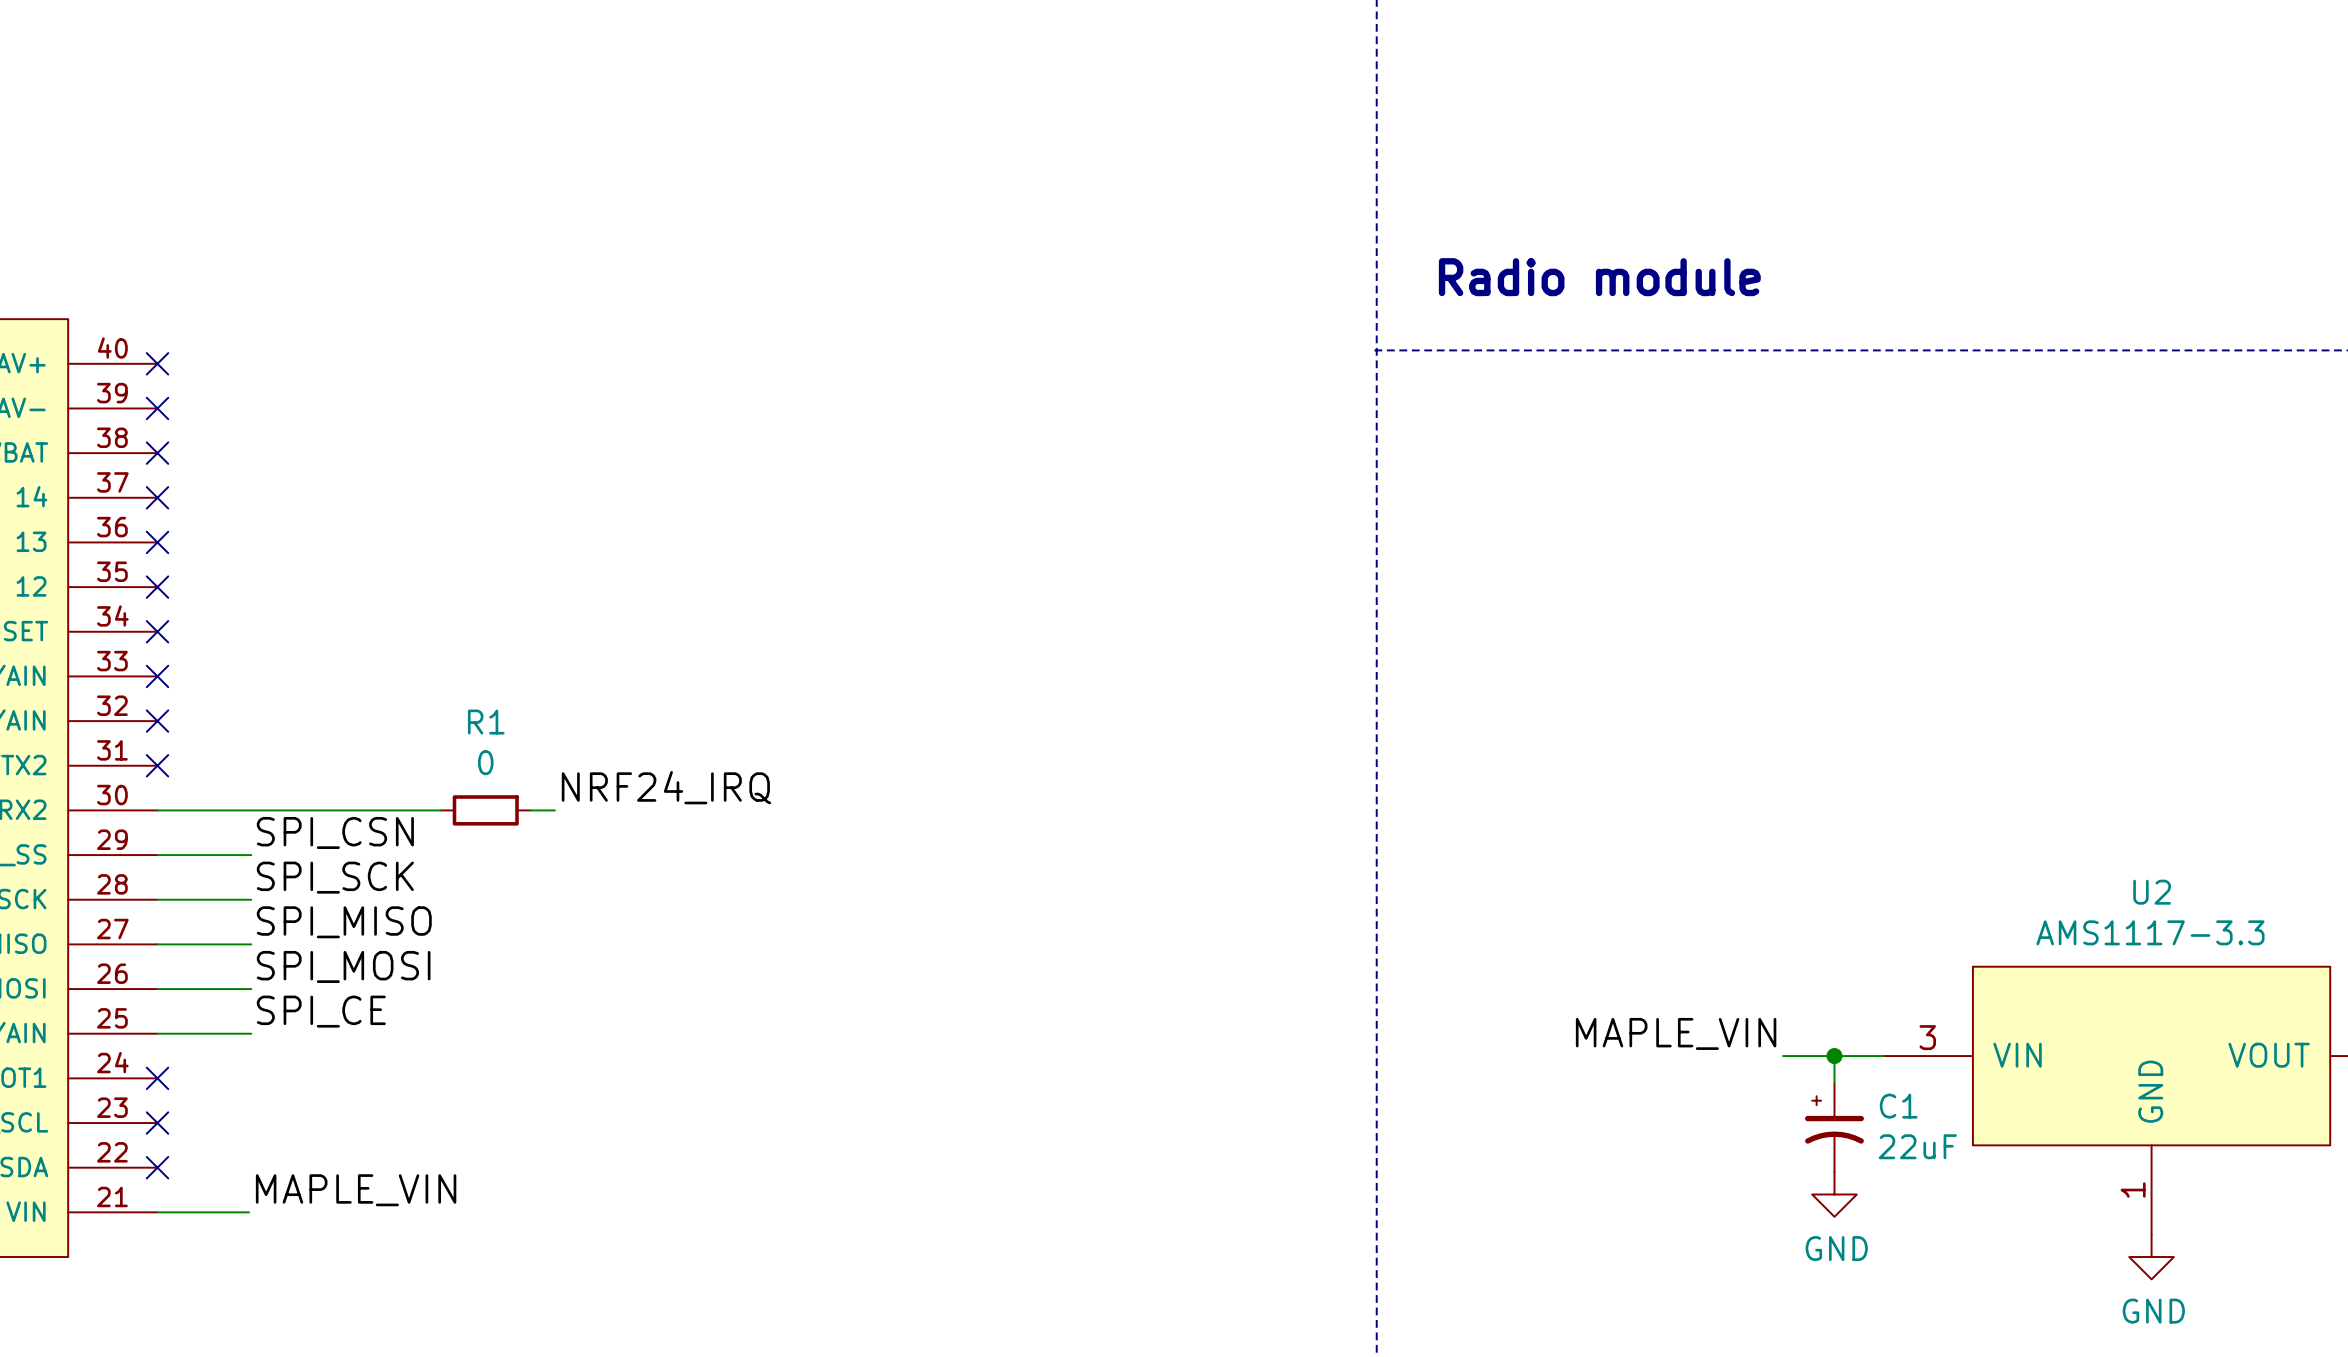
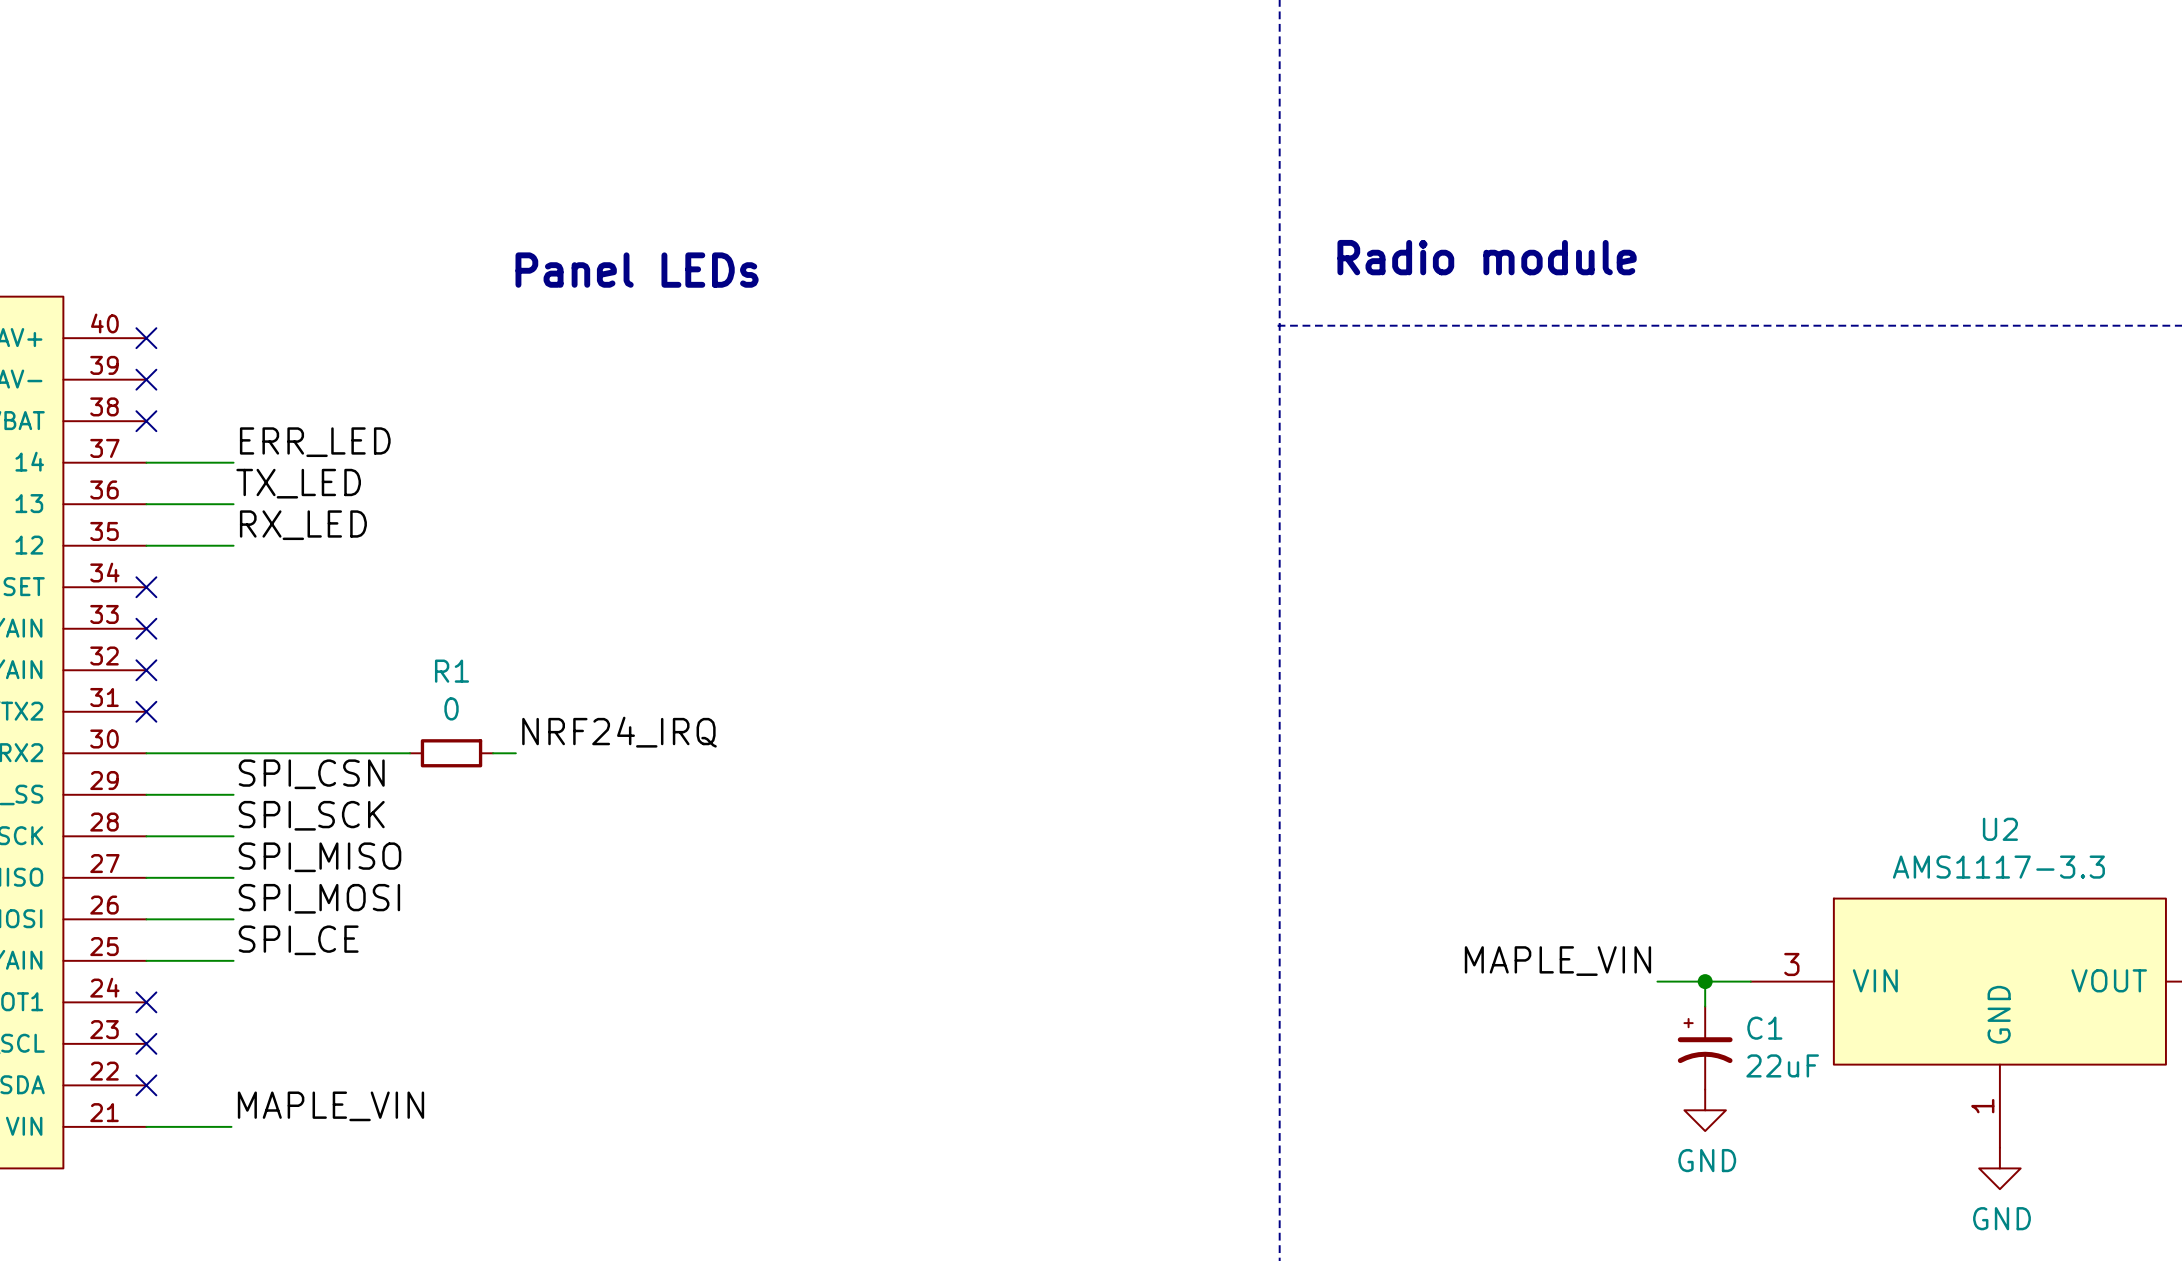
text: none -> Panel LEDs (637, 270)
label: none -> ERR_LED (315, 442)
wire: none -> (146, 462) (233, 462)
no-connect mark: (157, 497) -> none
label: none -> TX_LED (298, 483)
wire: none -> (146, 504) (233, 504)
no-connect mark: (157, 542) -> none
label: none -> RX_LED (303, 525)
wire: none -> (146, 545) (233, 545)
no-connect mark: (157, 587) -> none

